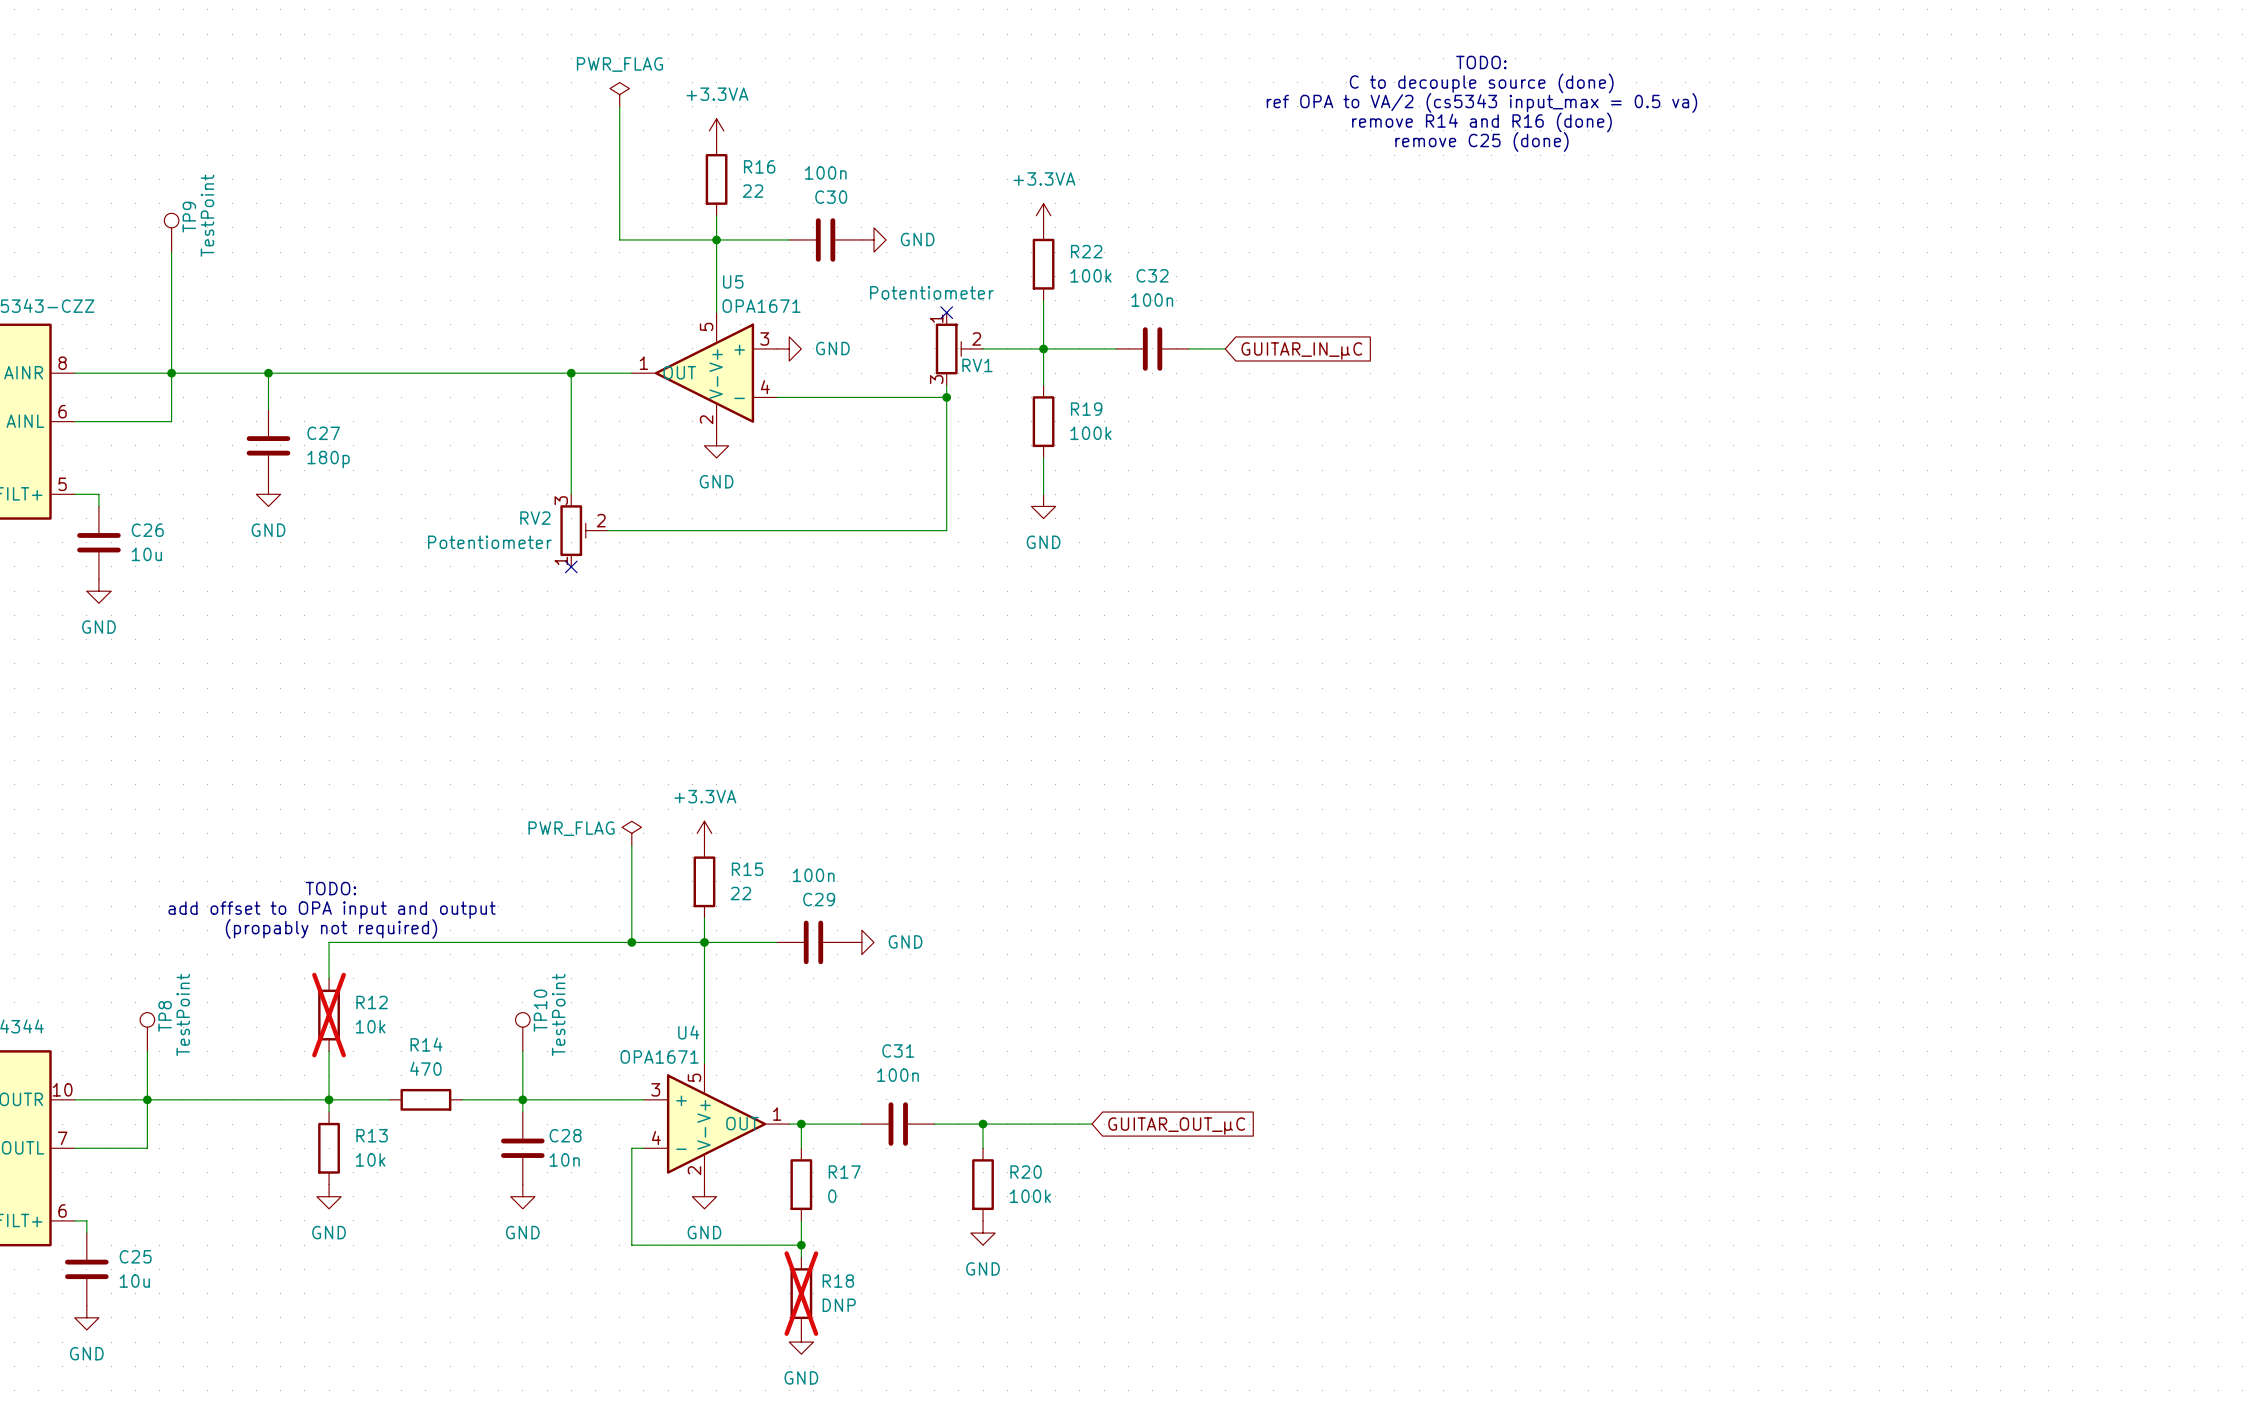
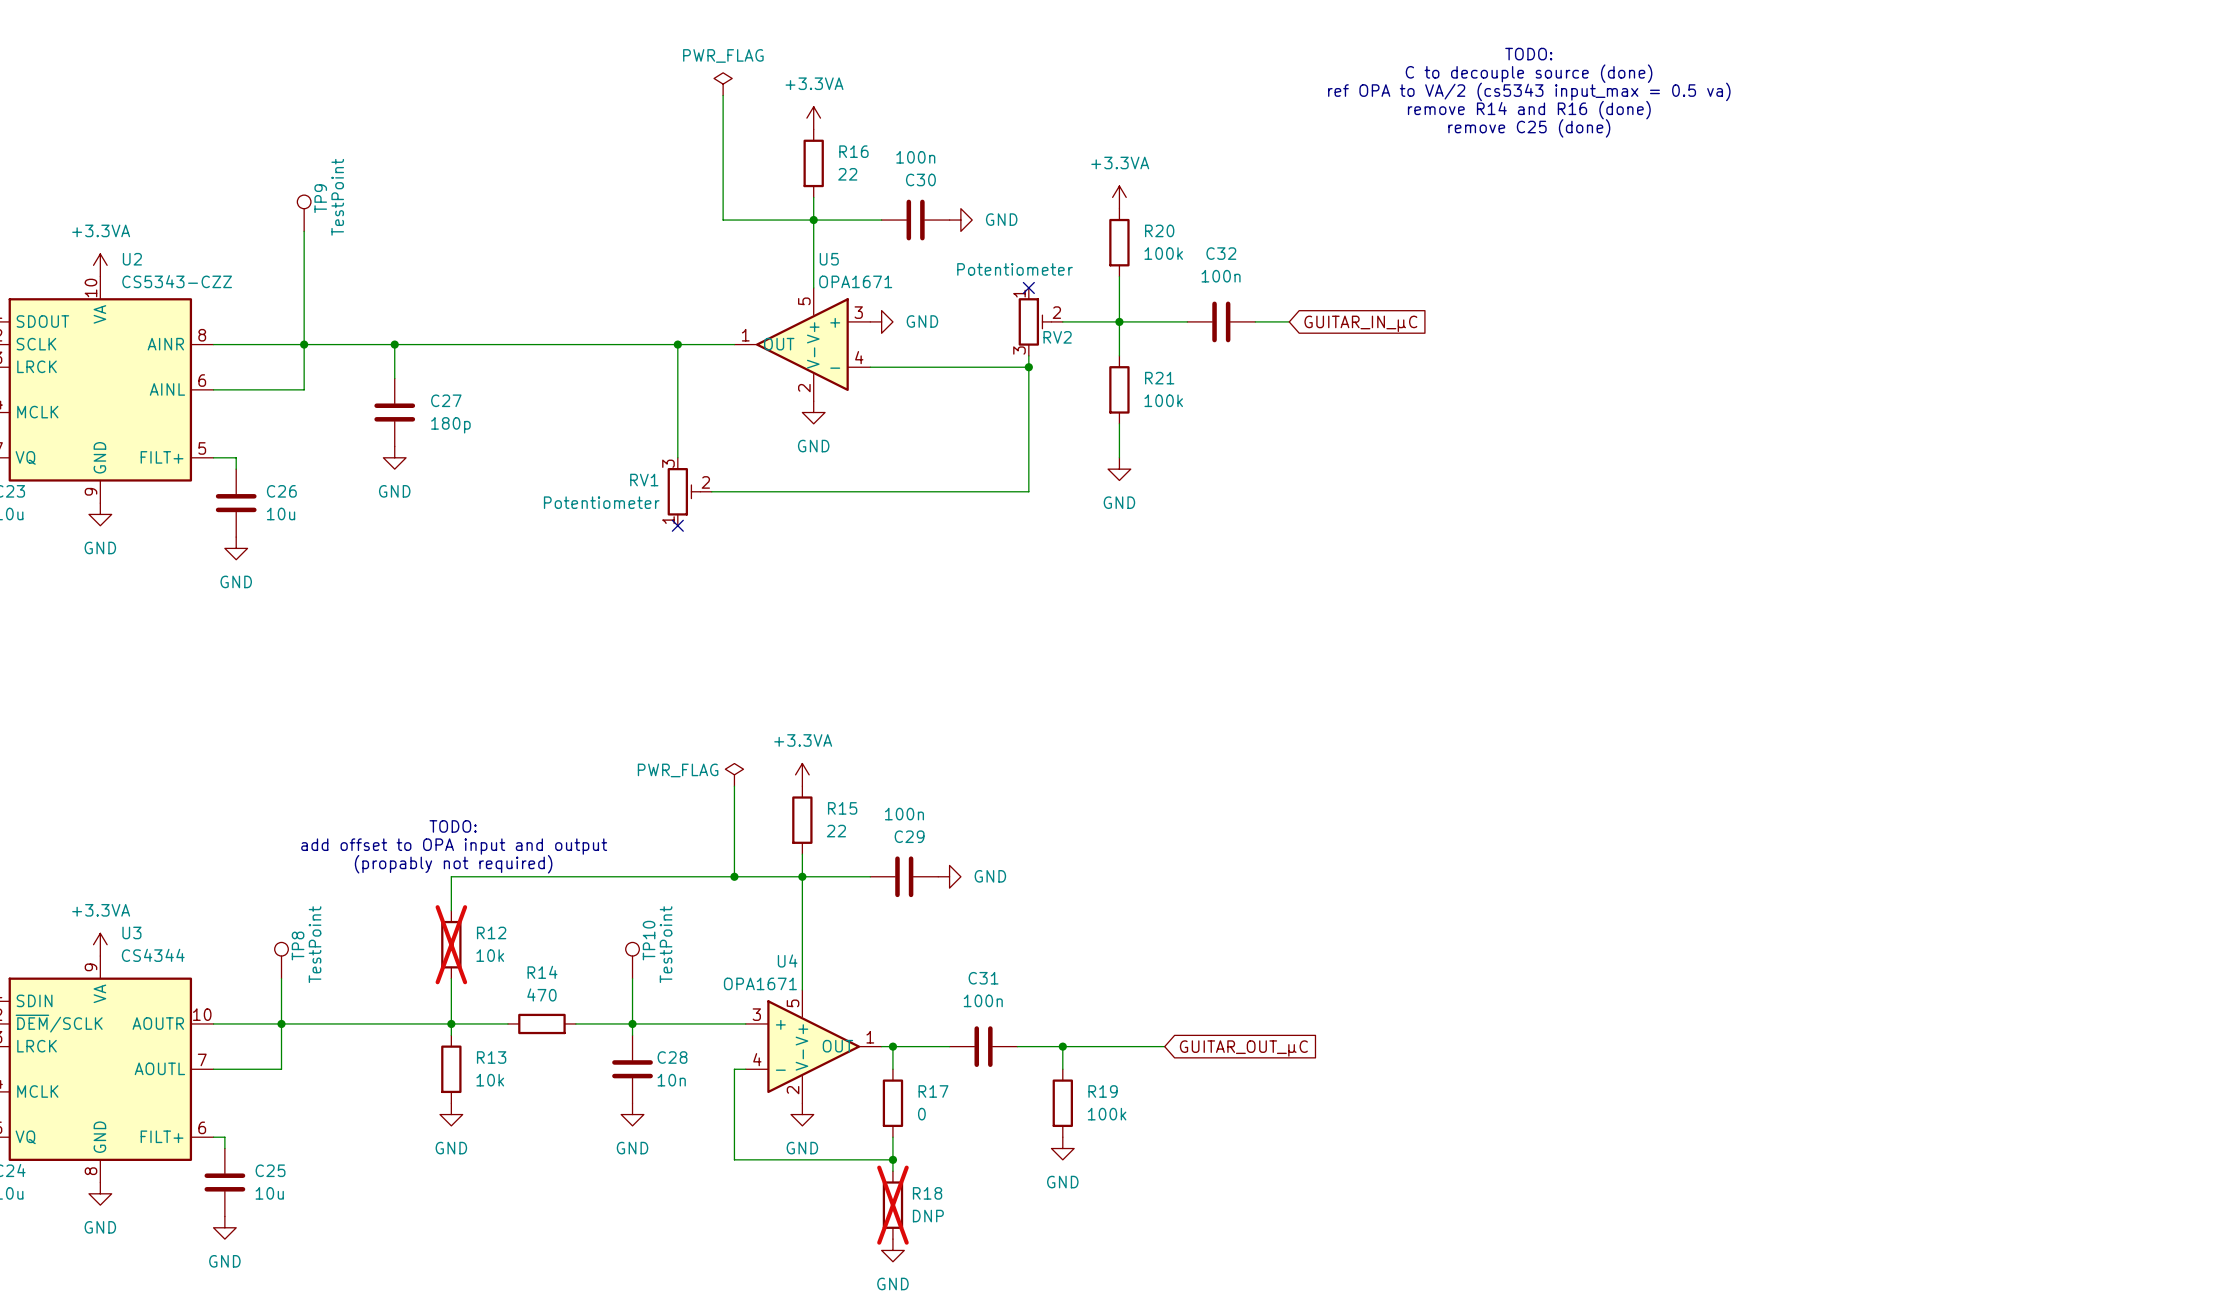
R22 name: R22 (1086, 251) -> R20 (1159, 230)
RV1 name: RV1 (977, 365) -> RV2 (1057, 337)
R19 name: R19 (1086, 409) -> R21 (1159, 378)
RV2 name: RV2 (535, 518) -> RV1 (644, 480)
R20 name: R20 (1026, 1172) -> R19 (1103, 1091)

